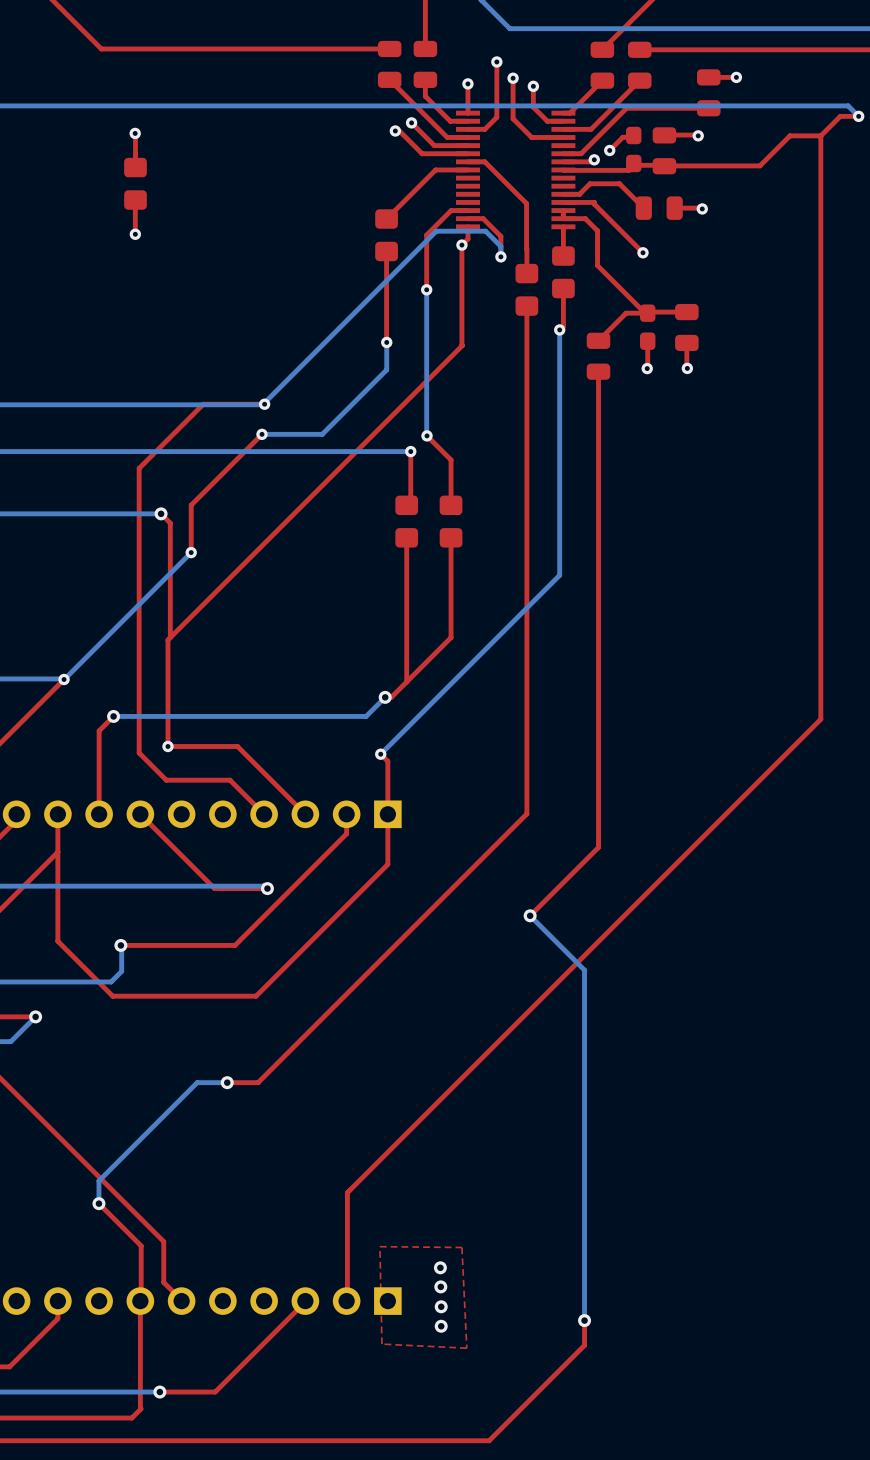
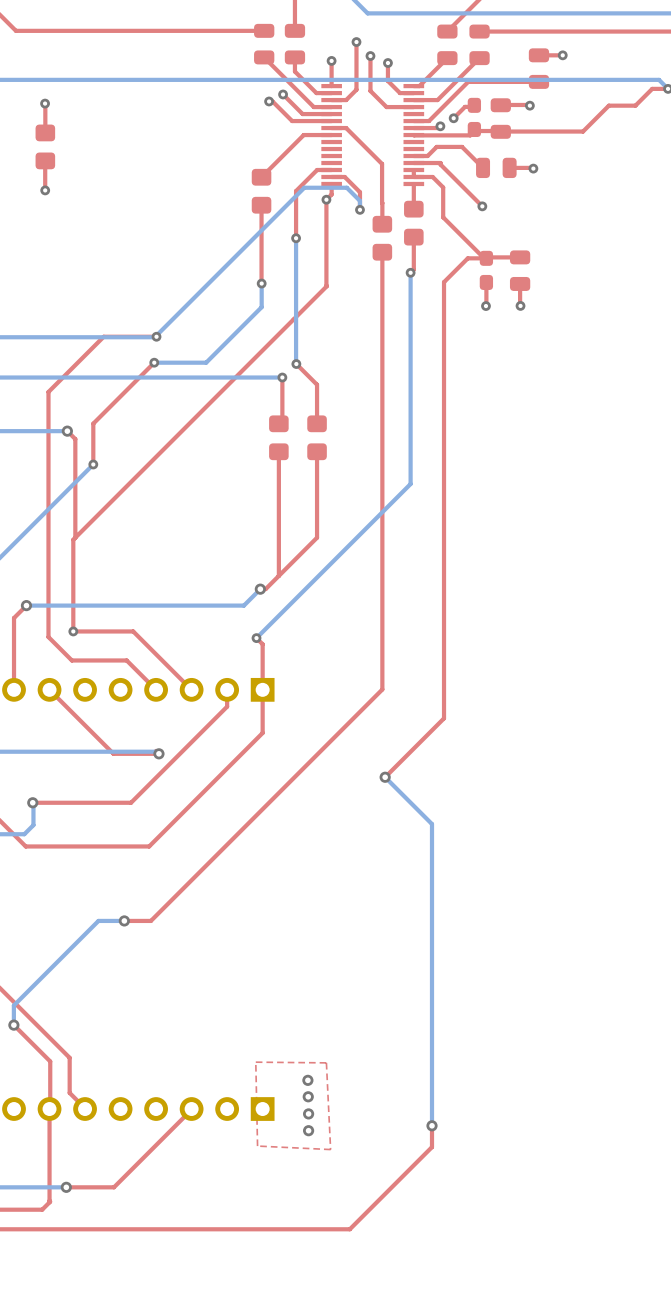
top track: (820, 135) (820, 719) (347, 1192) (347, 1301) -> none
top track: none -> (444, 282) (444, 308)
part: (598, 356) -> none

